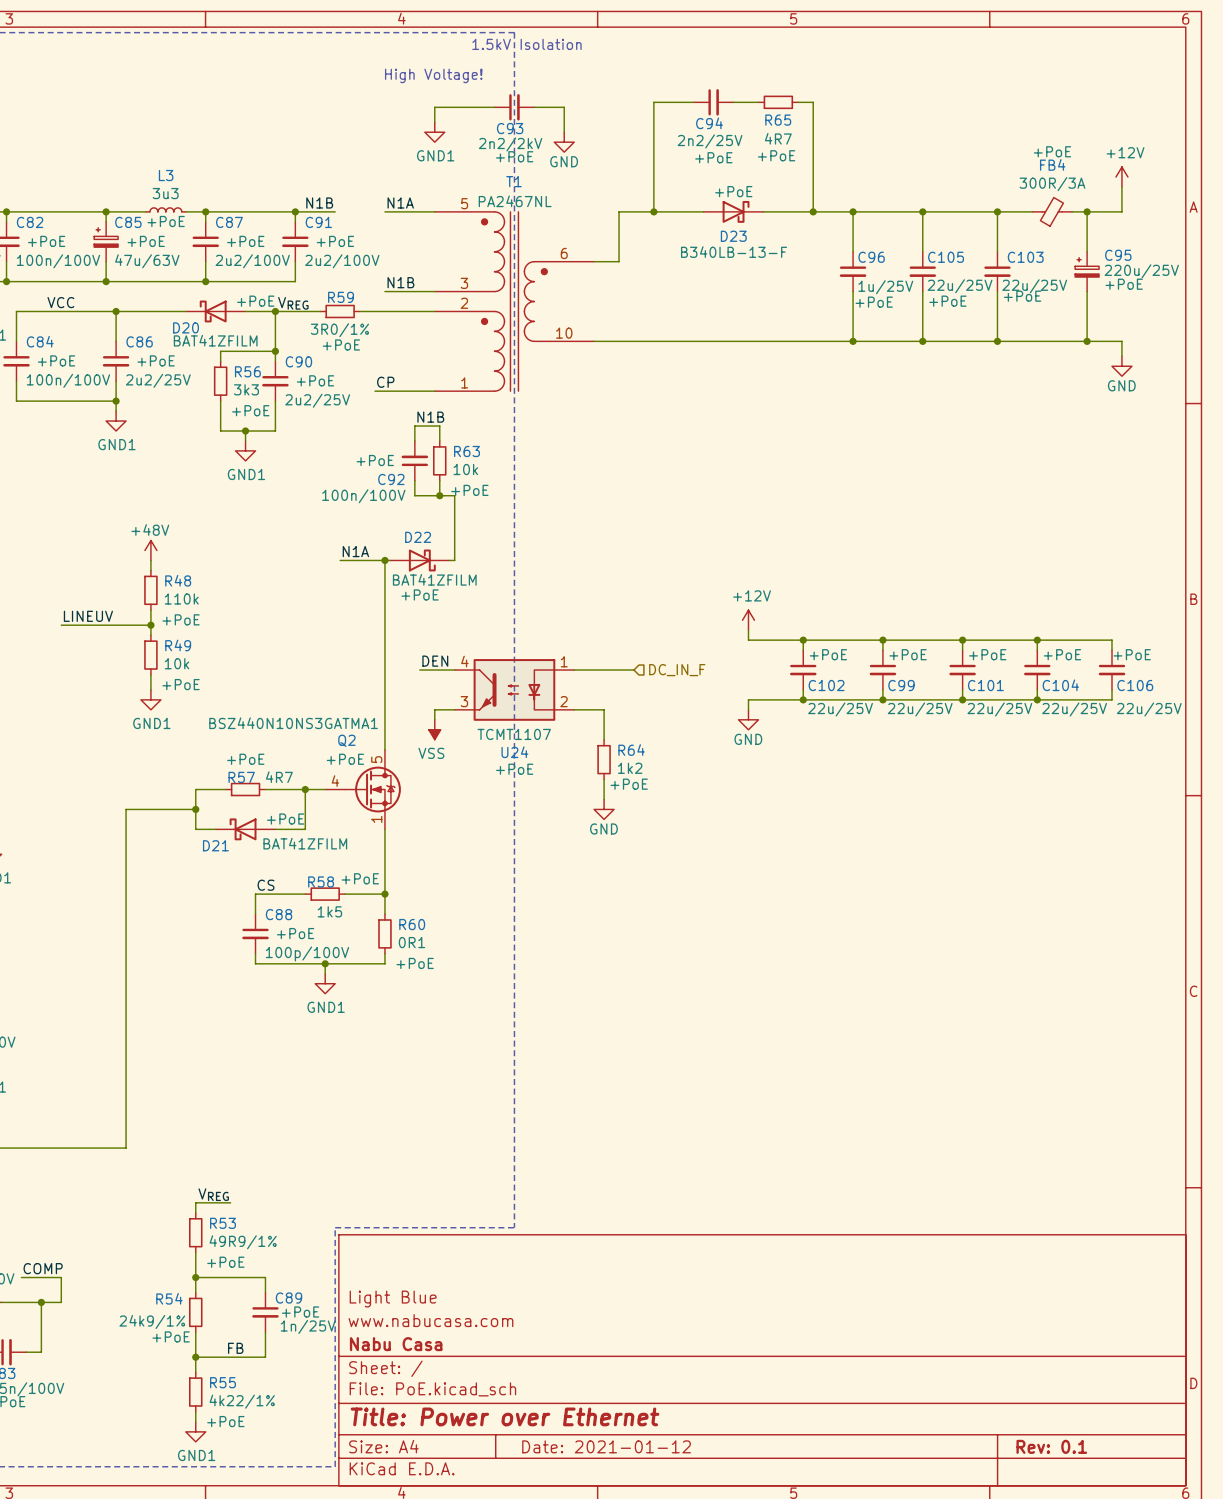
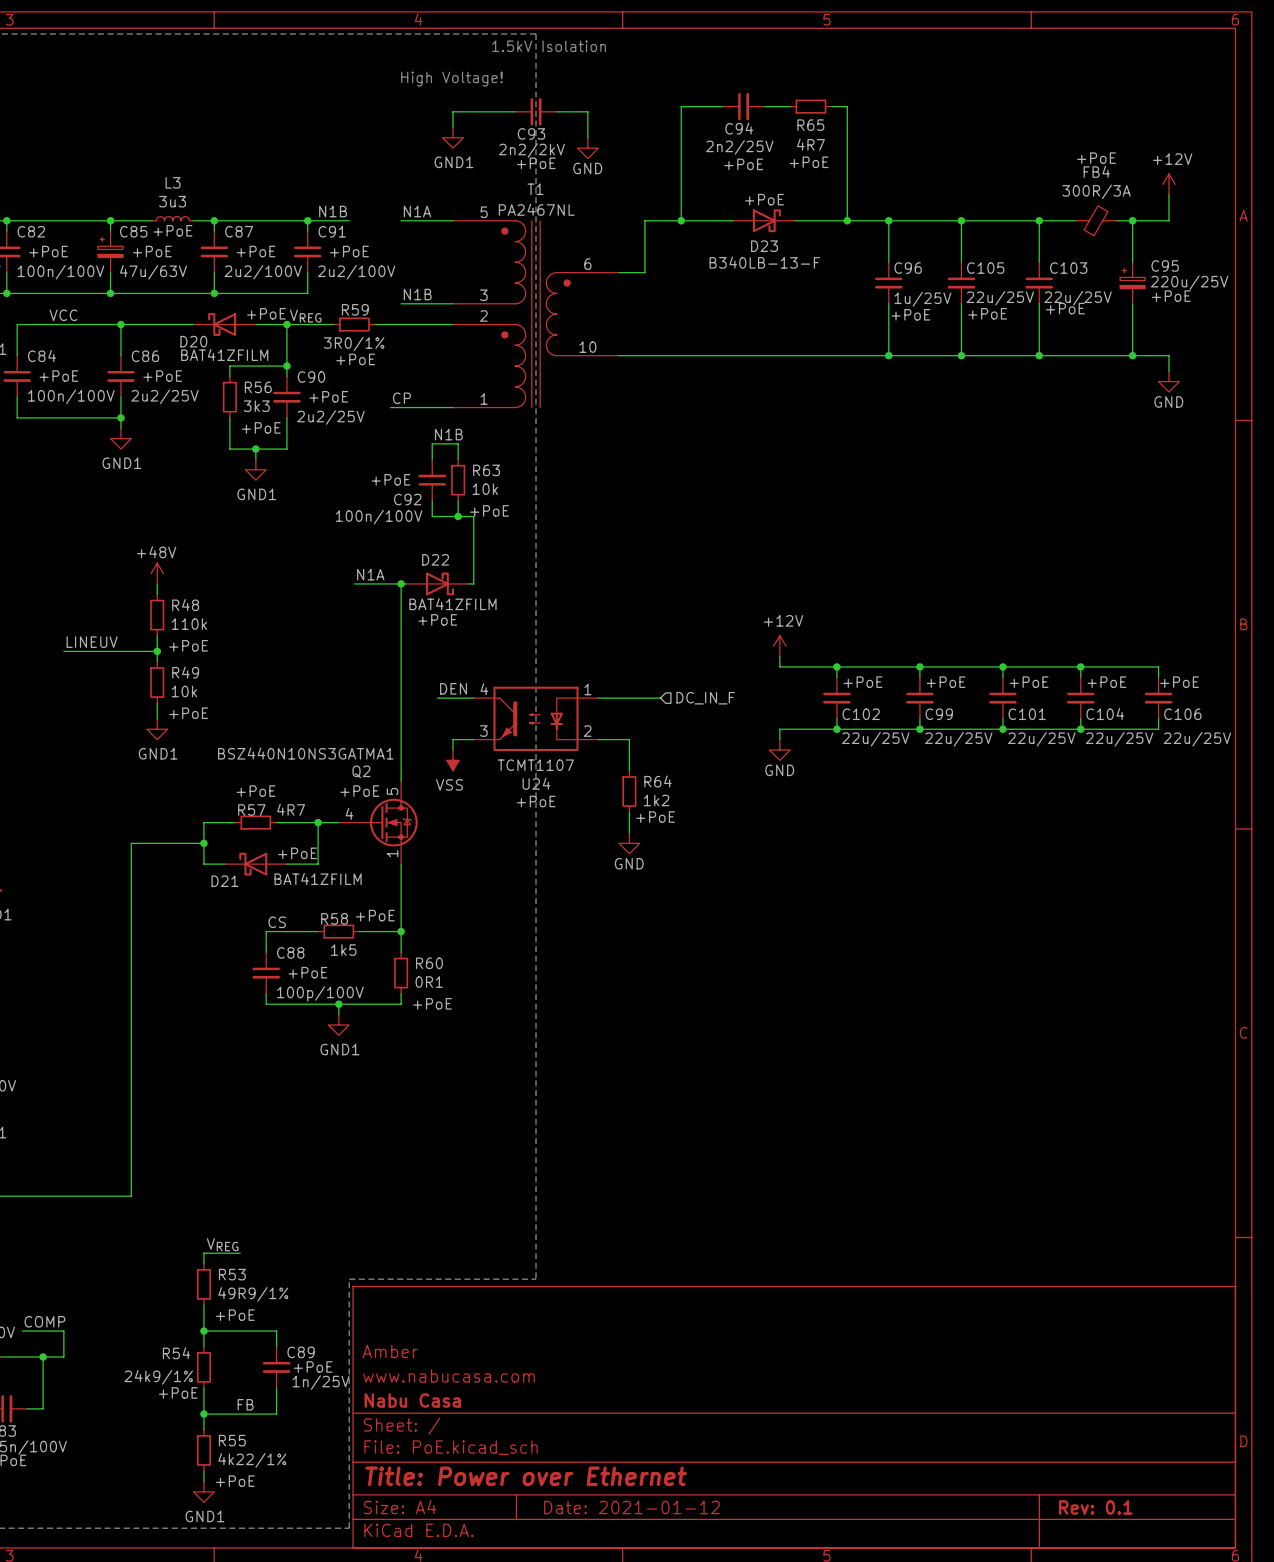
title block: Light Blue (393, 1299) -> Amber (390, 1351)

